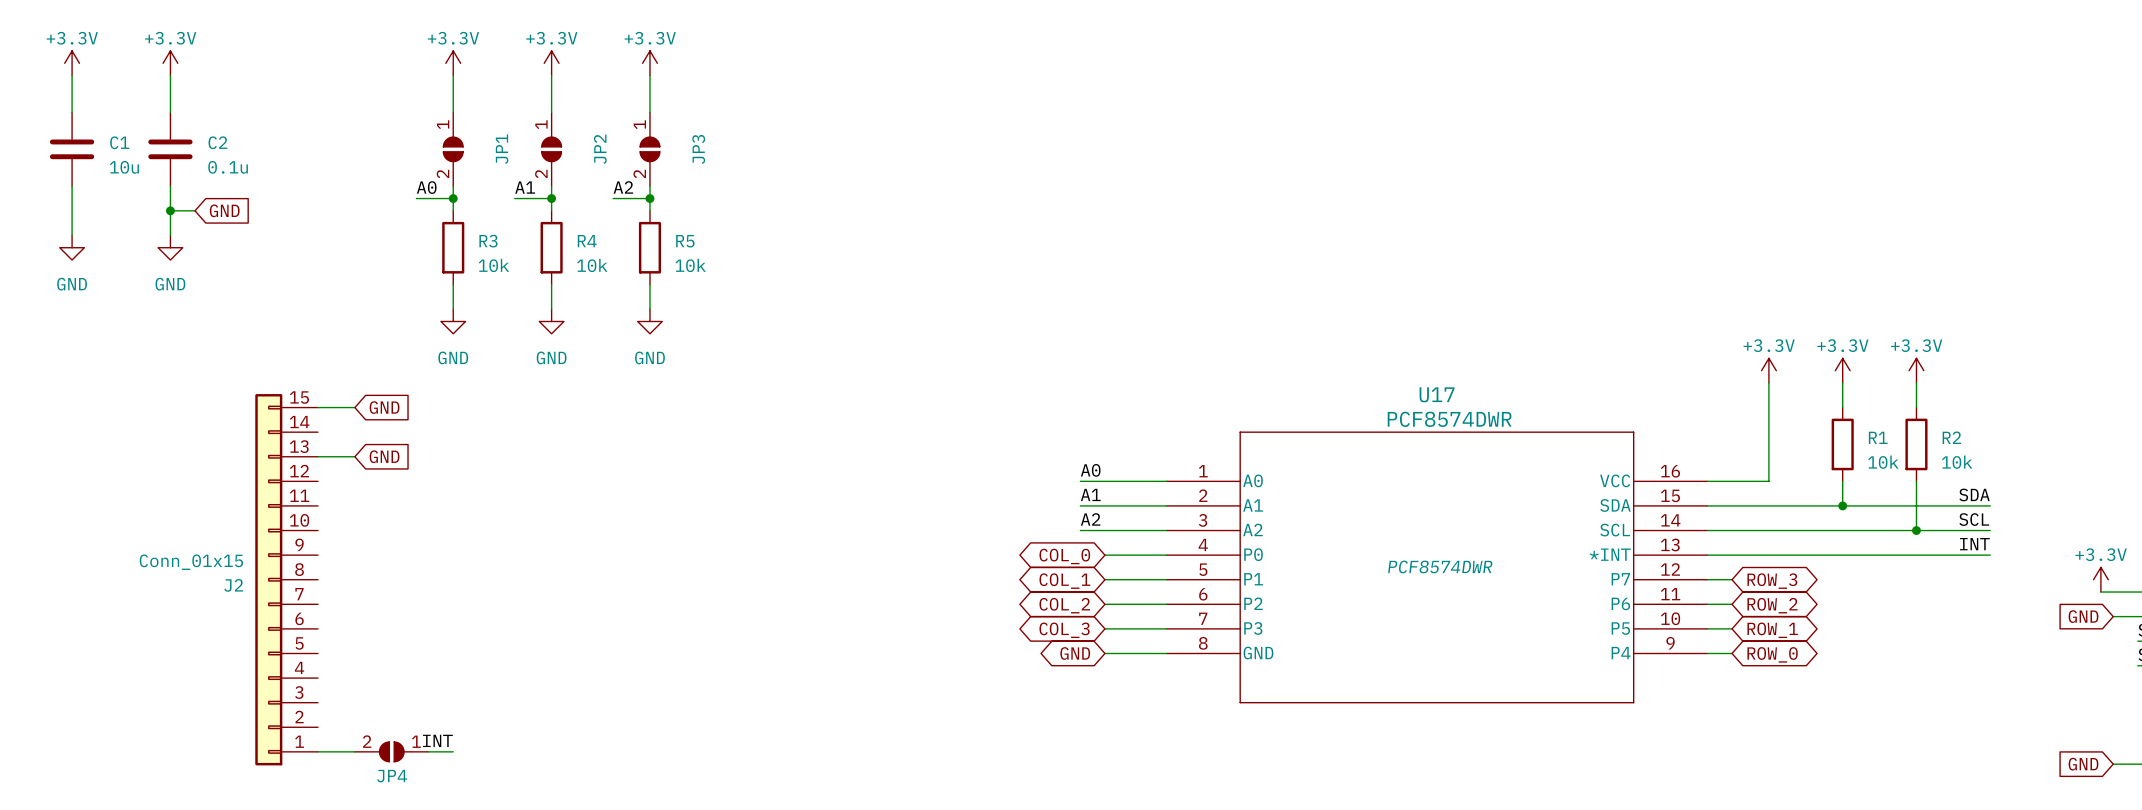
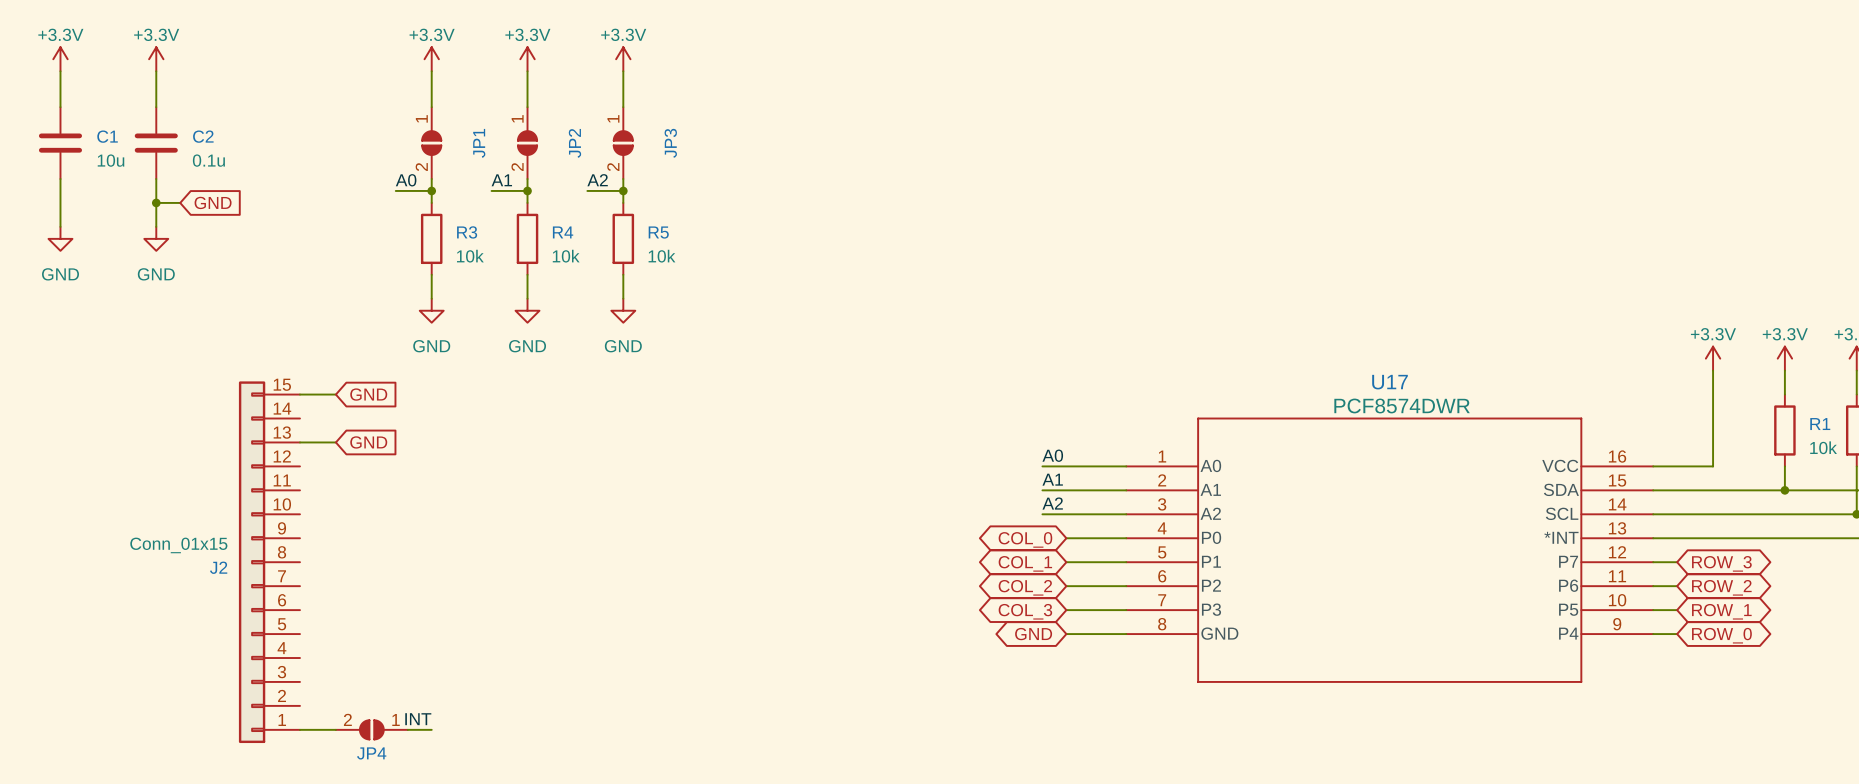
U17 text: PCF8574DWR (1440, 566) -> none

